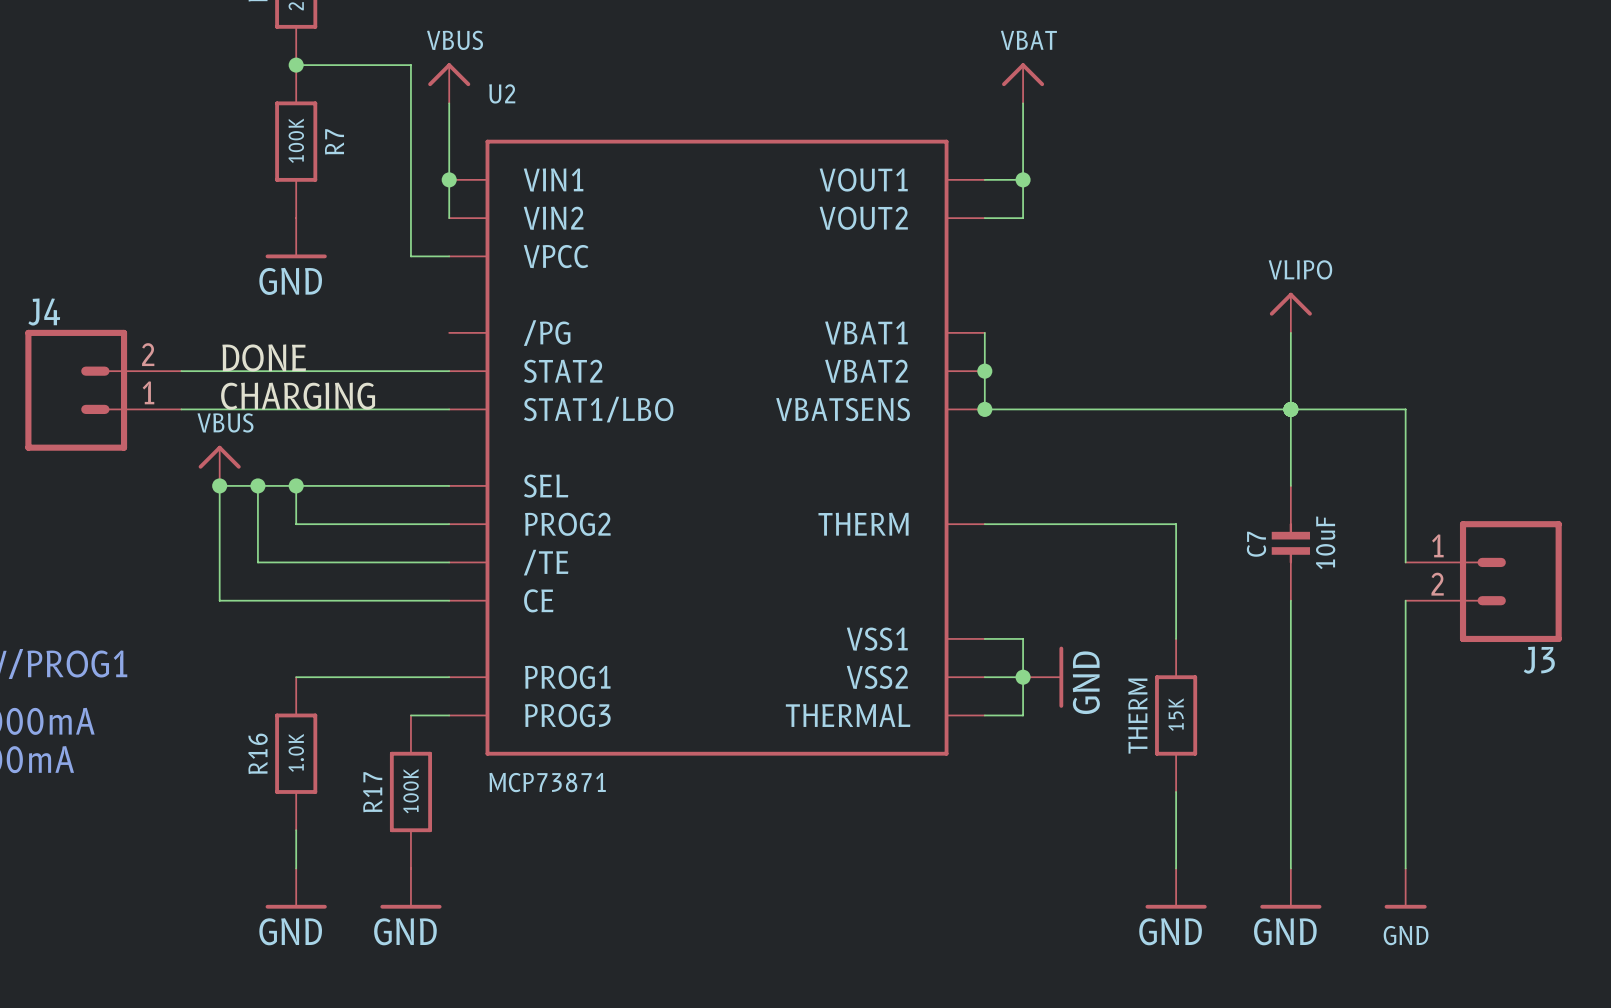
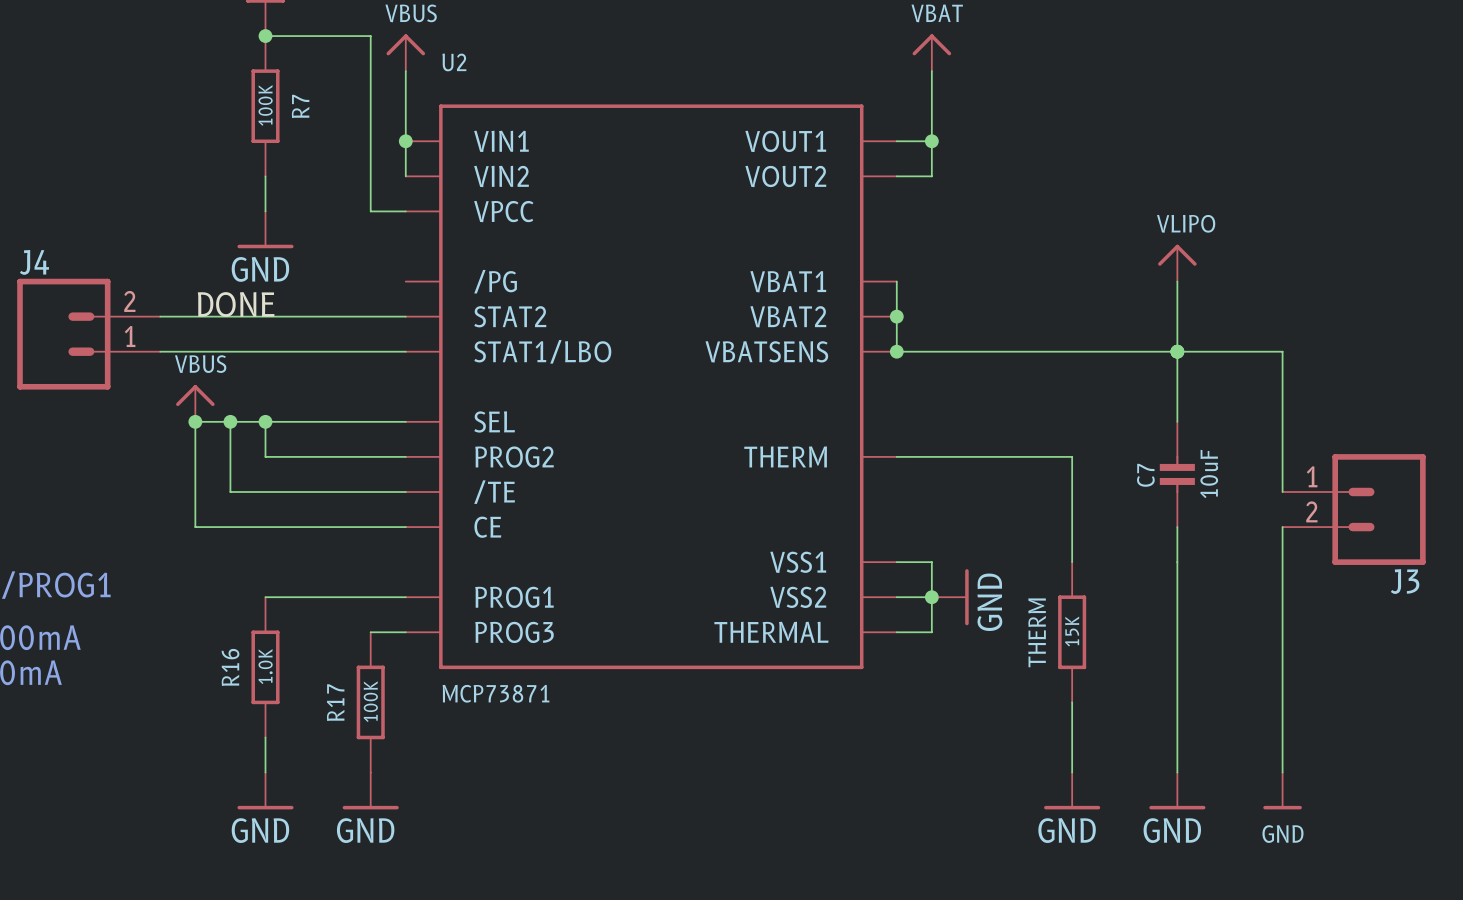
R7 symbol: [275, 65, 318, 219] -> [251, 36, 280, 177]
power symbol position: GND (296, 238) -> GND (265, 229)
label: CHARGING (298, 396) -> none
THERM symbol: [1155, 638, 1198, 792] -> [1058, 562, 1087, 703]
R16 symbol: [275, 677, 318, 831] -> [251, 597, 280, 738]
R17 symbol: [389, 715, 433, 869] -> [356, 632, 385, 773]

